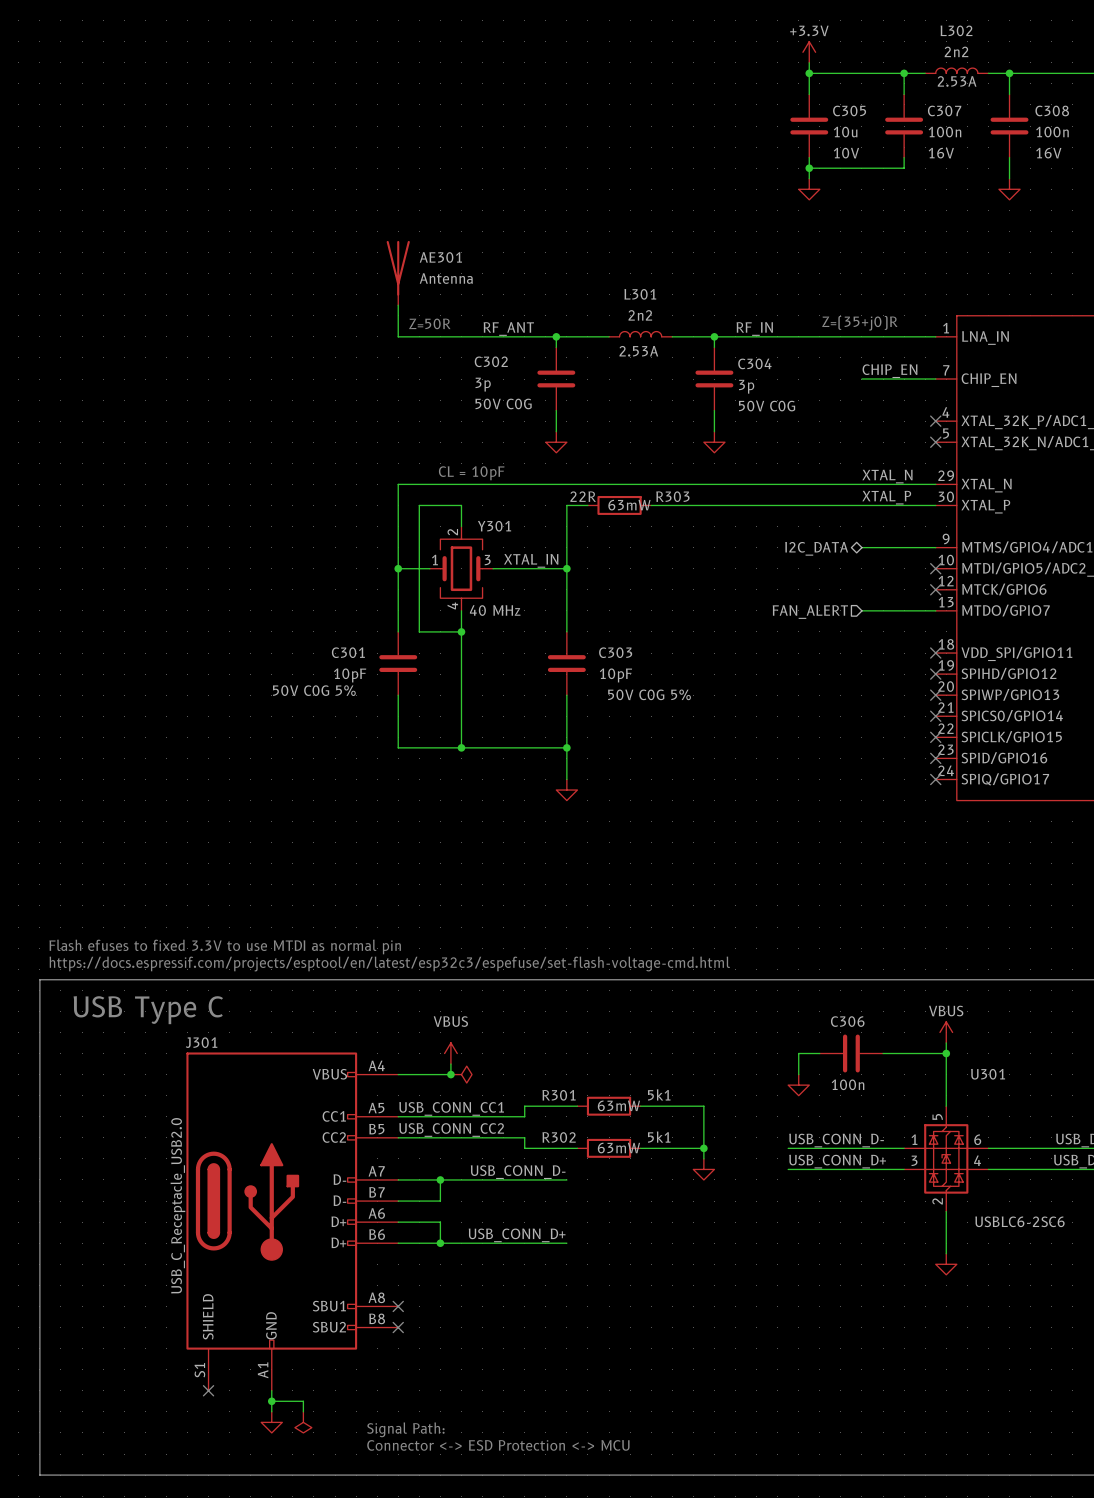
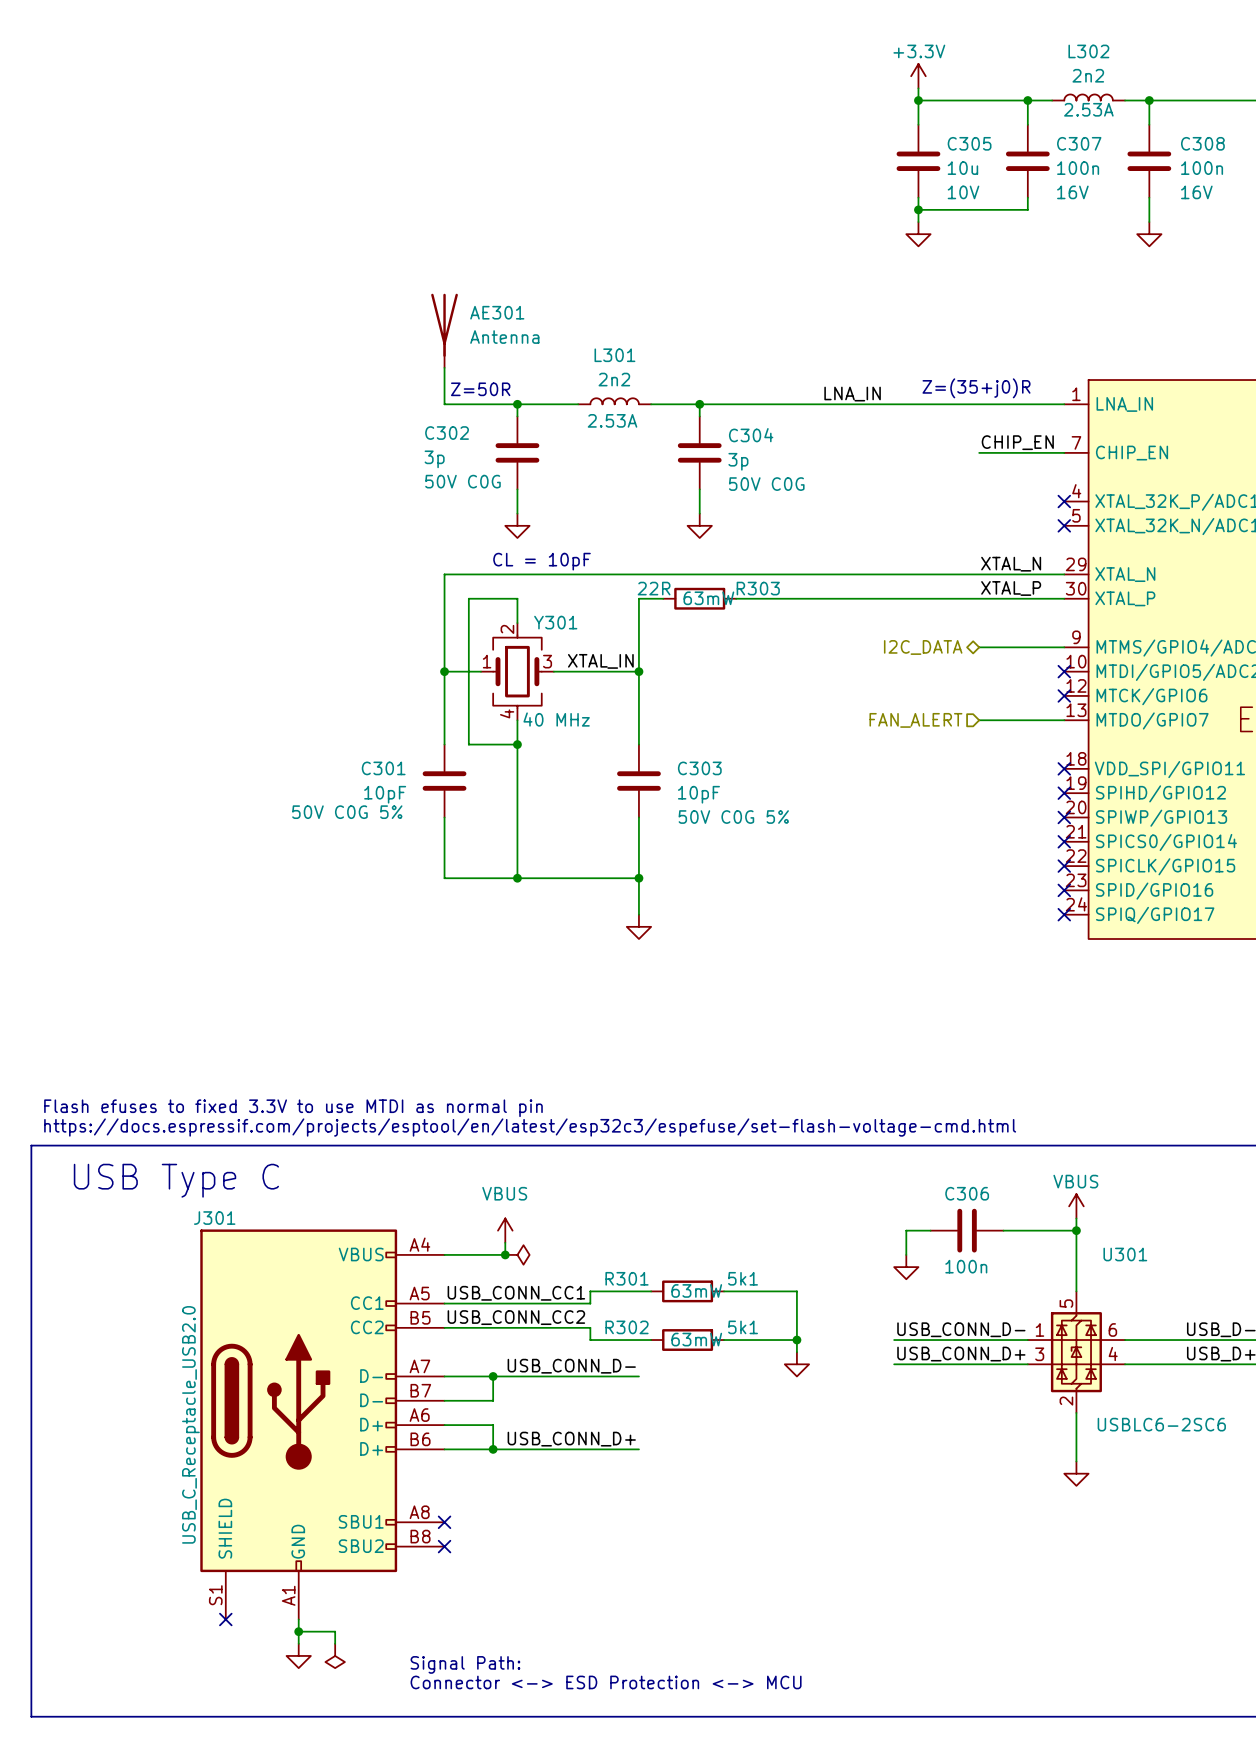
label: RF_ANT (508, 329) -> none
label: none -> LNA_IN (852, 394)
label: RF_IN (754, 329) -> none
L301 position: (640, 334) -> (614, 401)
junction: none -> (517, 404)
wire: (514, 336) (577, 336) -> (687, 404) (760, 404)
wire: (556, 336) (556, 347) -> (517, 404) (517, 416)
junction: (556, 336) -> none
junction: none -> (699, 404)
wire: (714, 336) (714, 347) -> (699, 404) (699, 416)
junction: (714, 336) -> none
C302 position: (556, 379) -> (517, 452)
C304 position: (714, 379) -> (699, 452)
wire: (556, 410) (556, 431) -> (517, 489) (517, 513)
wire: (714, 410) (714, 431) -> (699, 489) (699, 513)
power symbol: none -> (517, 525)
power symbol: (556, 442) -> none
power symbol: none -> (699, 525)
power symbol: (714, 442) -> none

